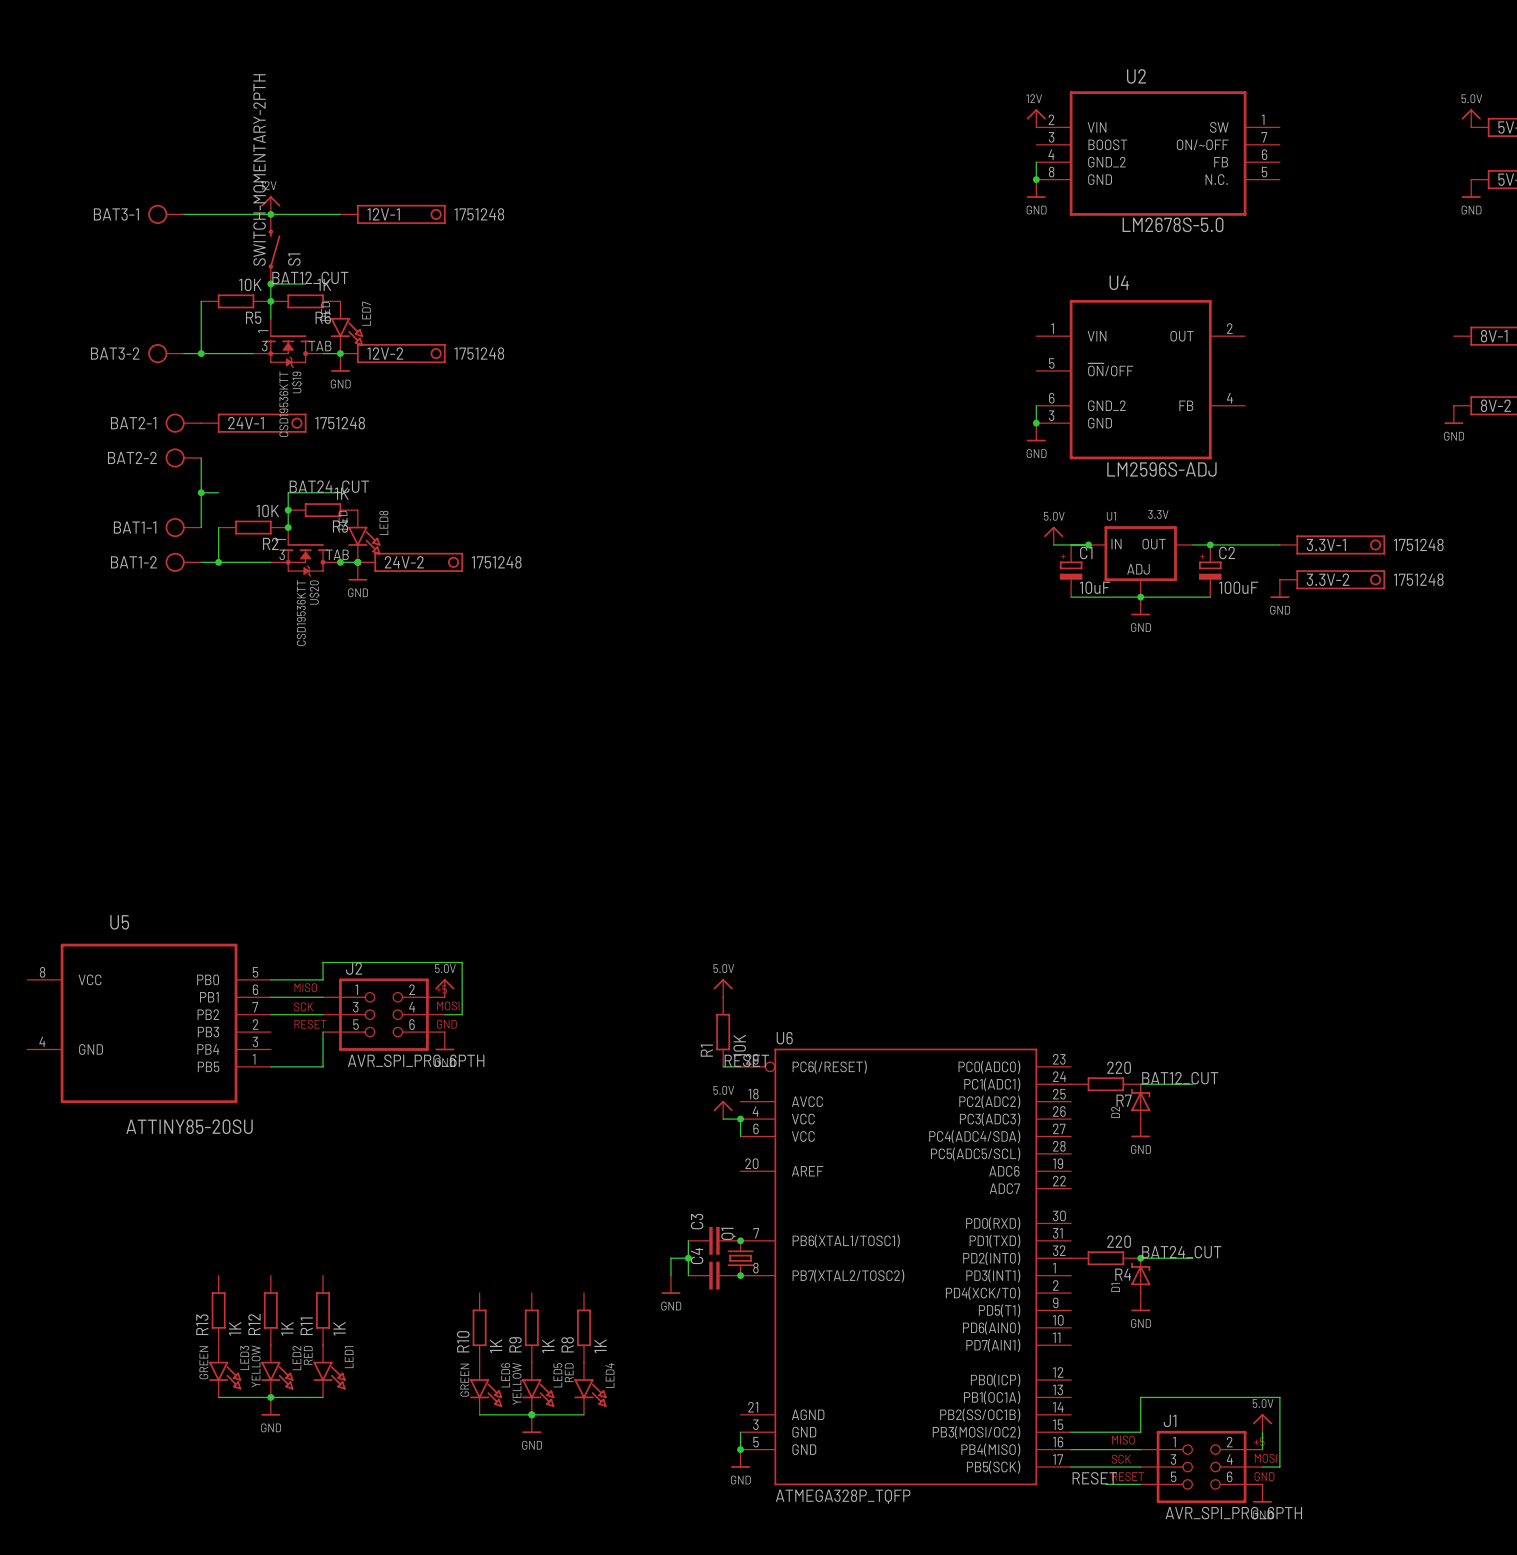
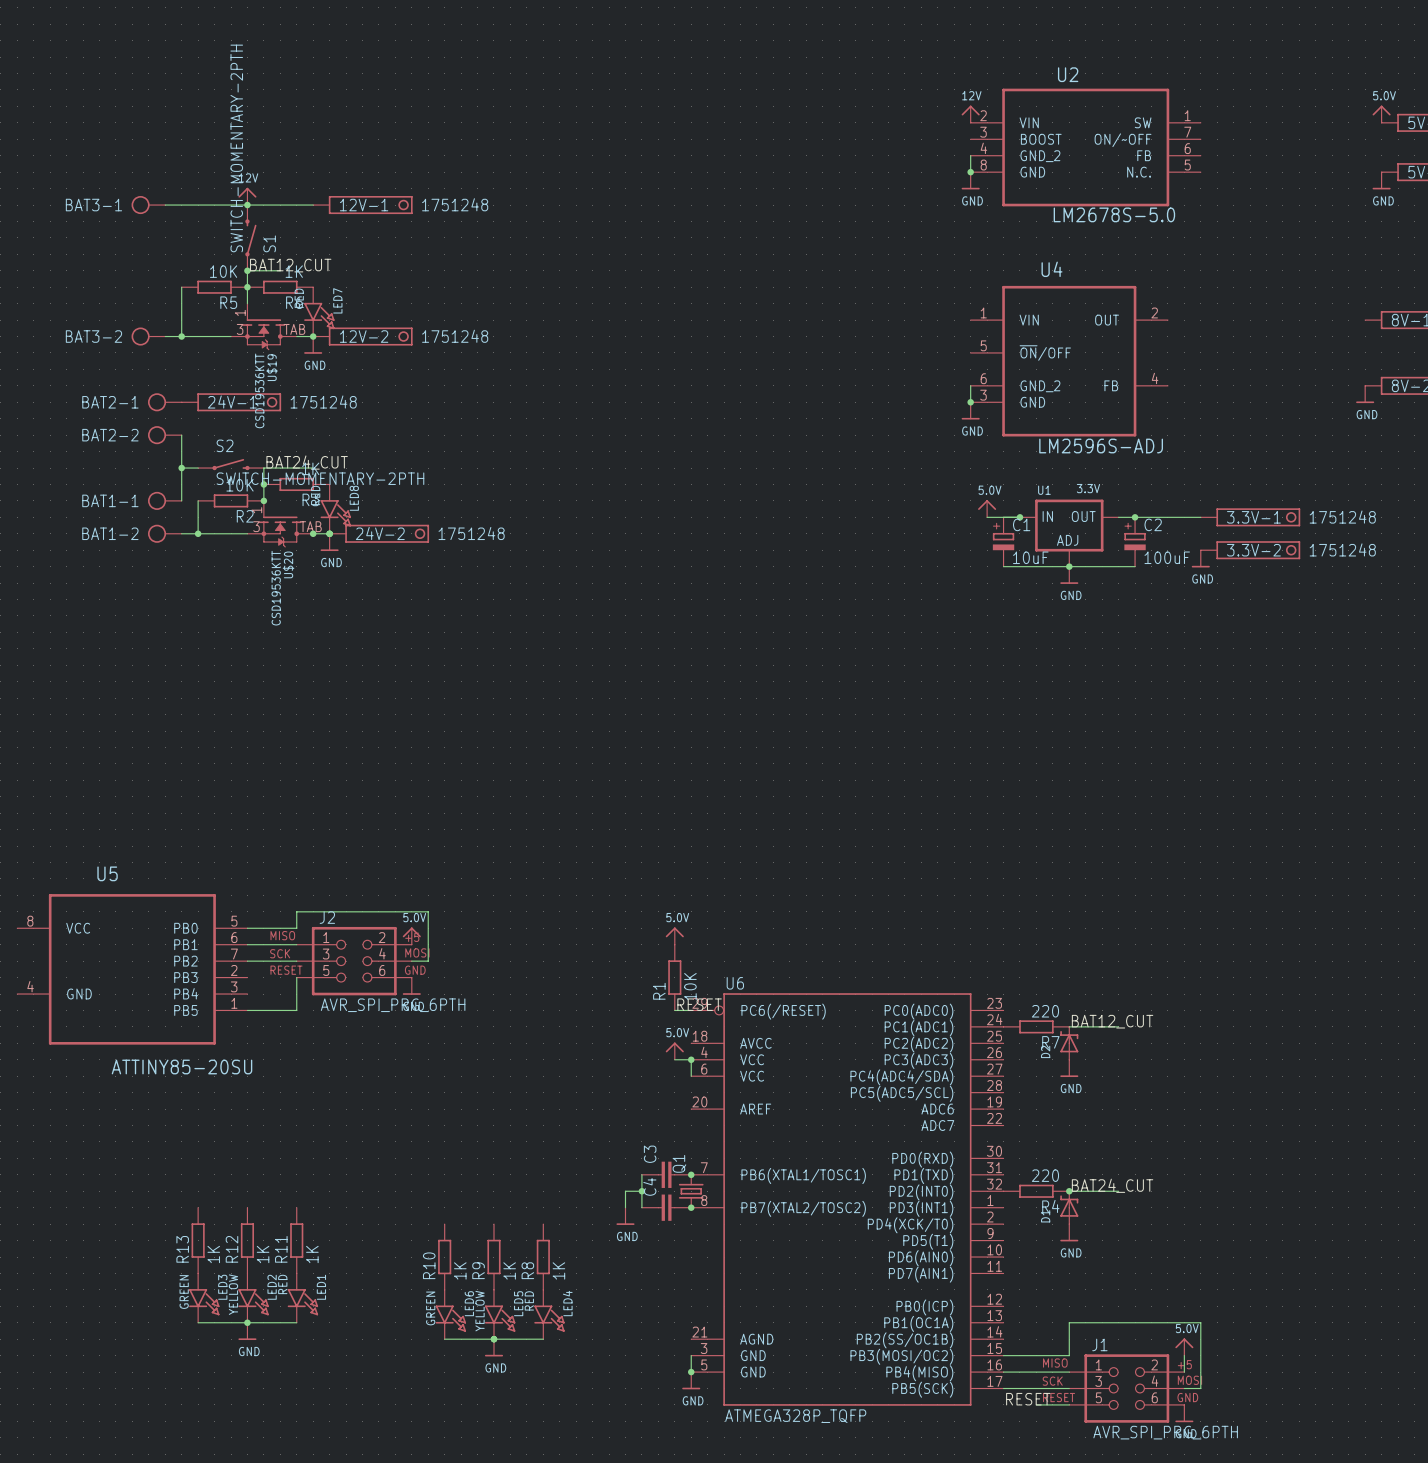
S2: none -> SWITCH-MOMENTARY-2PTH (231, 464)

